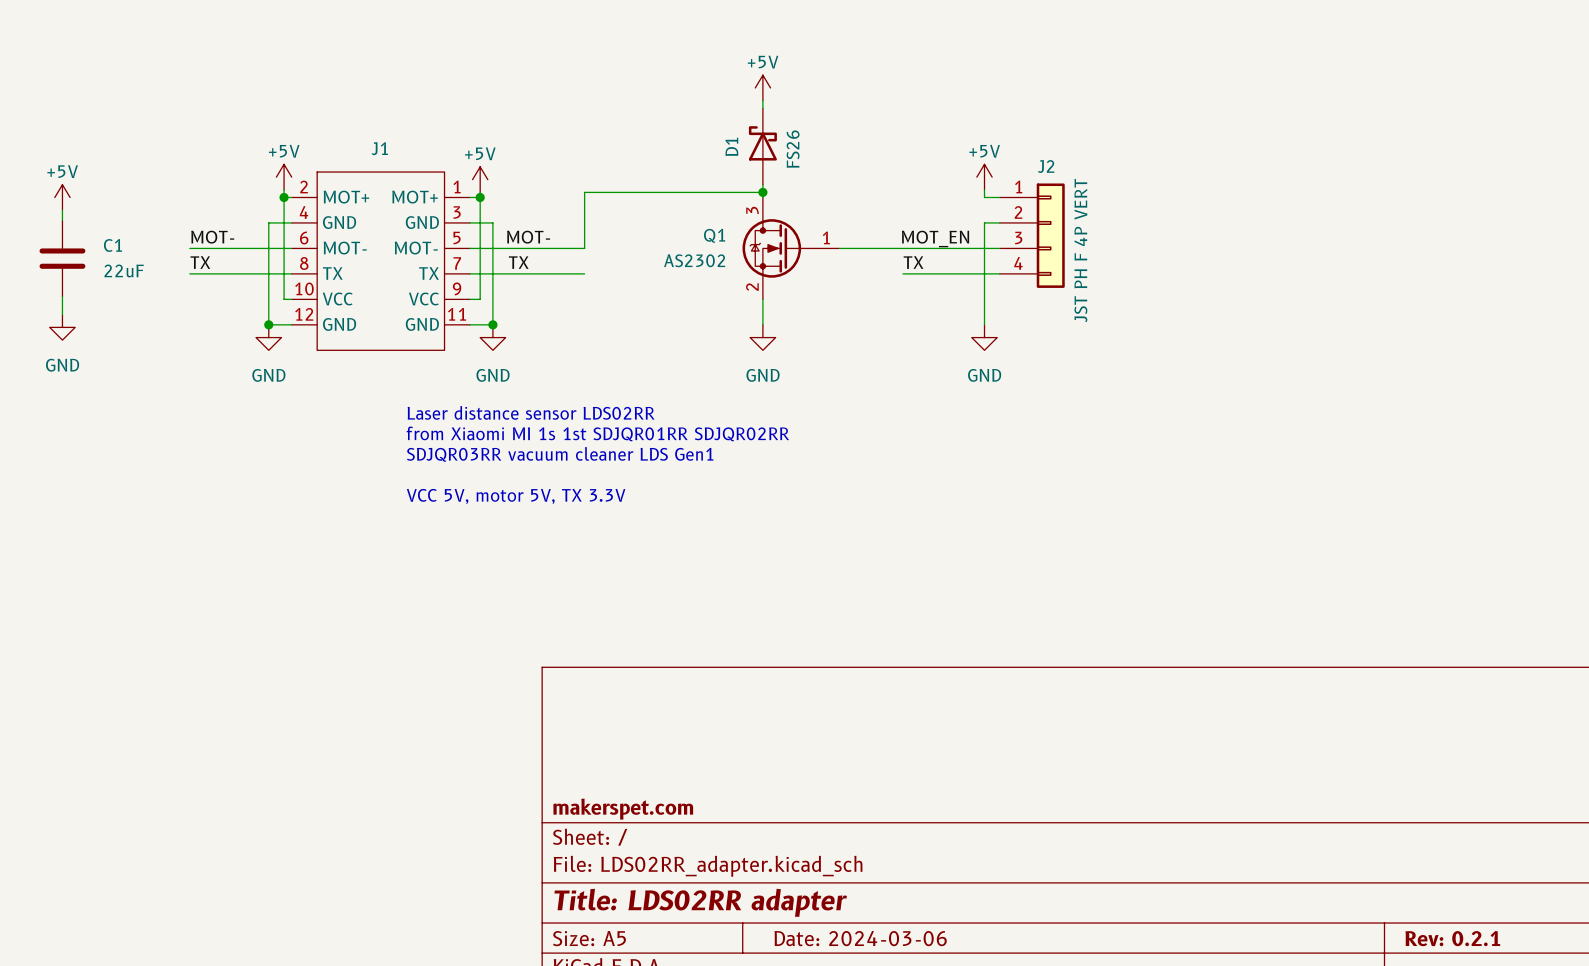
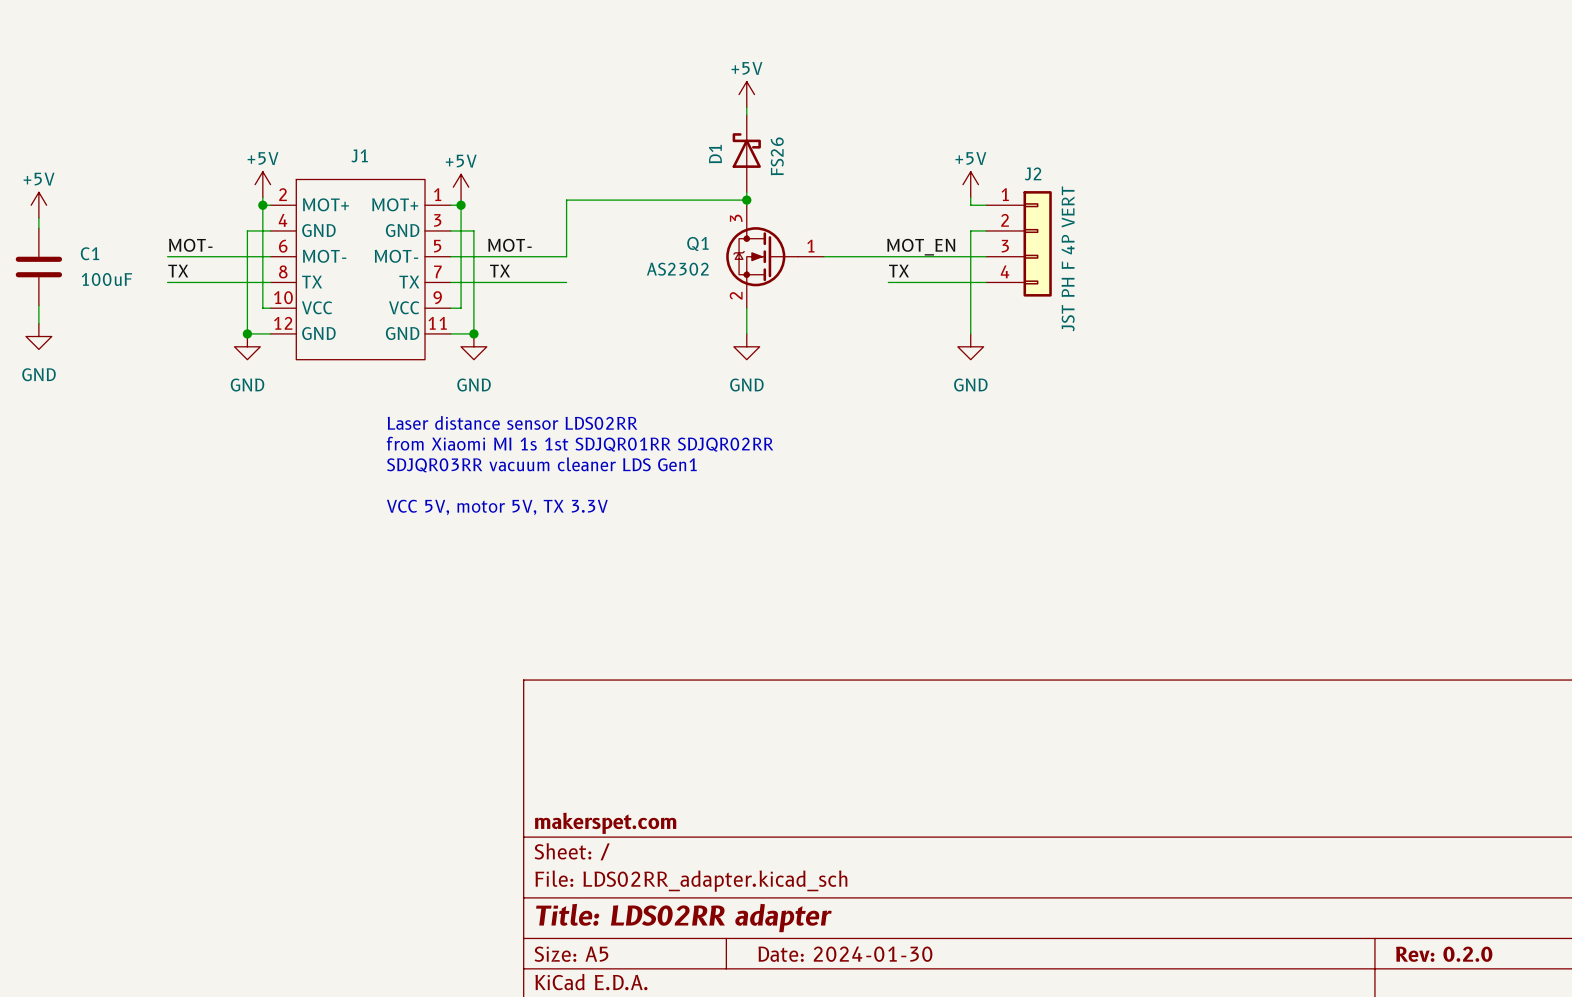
C1 value: 22uF (124, 270) -> 100uF (106, 279)
title block: Date: 2024-03-06 (860, 938) -> Date: 2024-01-30 (845, 954)
title block: Rev: 0.2.1 (1452, 938) -> Rev: 0.2.0 (1444, 954)

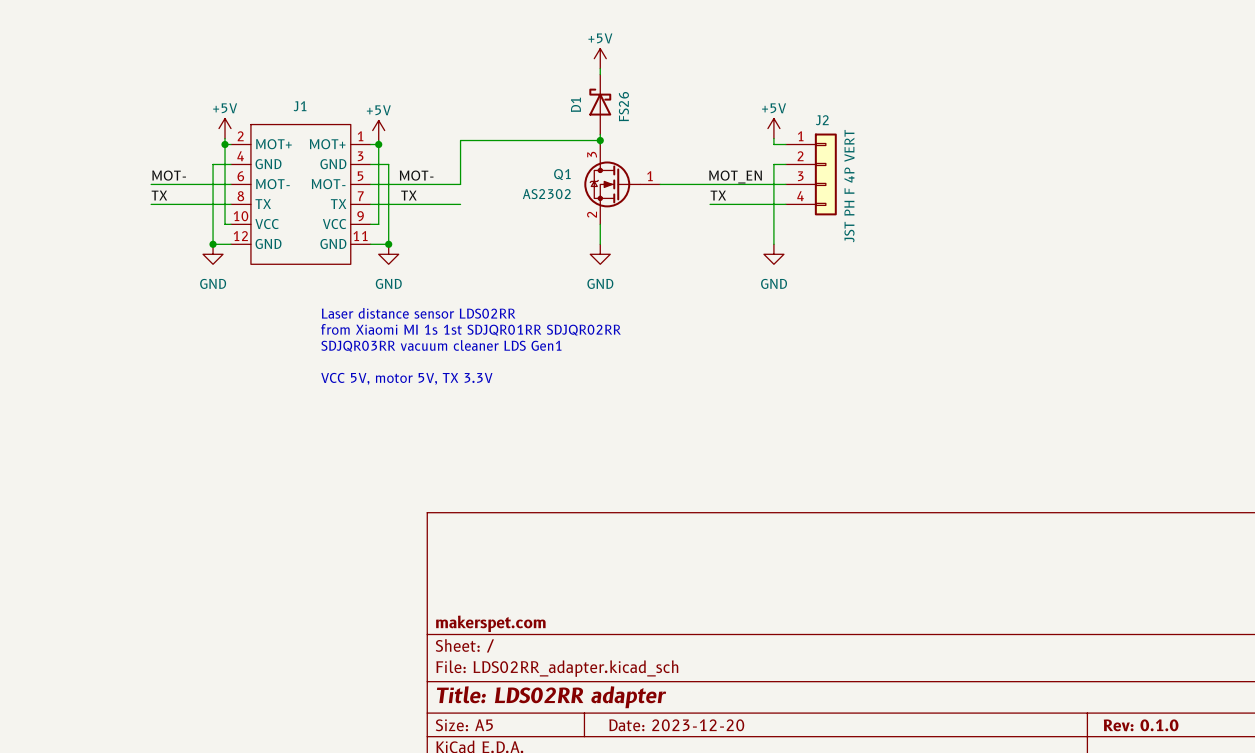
power symbol: +5V (38, 205) -> none
wire: (38, 218) (38, 228) -> none
C1: 100uF (38, 267) -> none
wire: (38, 305) (38, 323) -> none
power symbol: GND (38, 336) -> none
title block: Date: 2024-01-30 (845, 954) -> Date: 2023-12-20 (676, 725)
title block: Rev: 0.2.0 (1444, 954) -> Rev: 0.1.0 (1141, 725)

